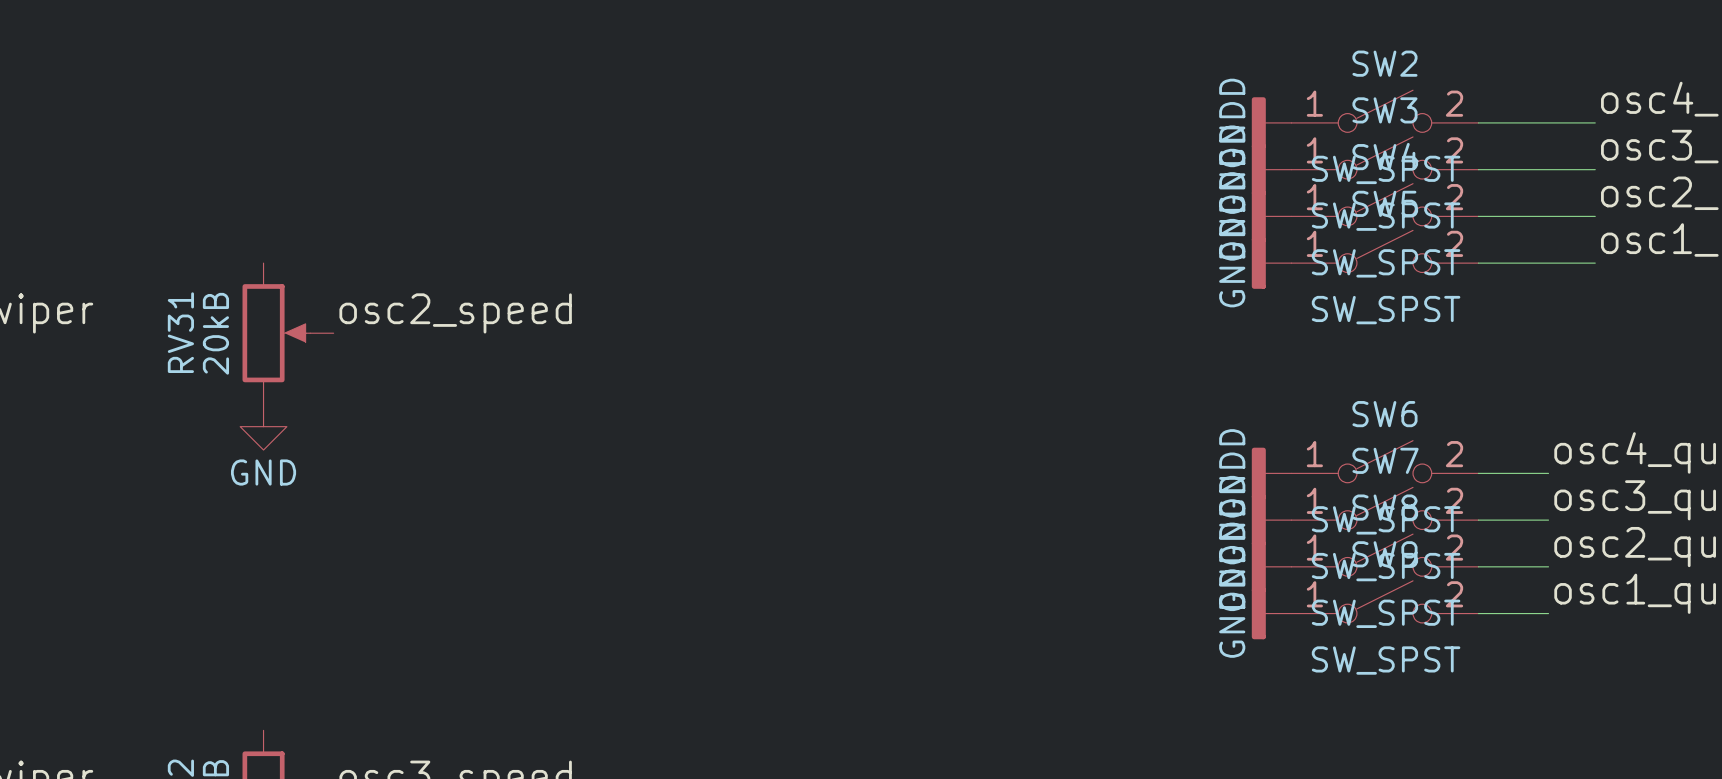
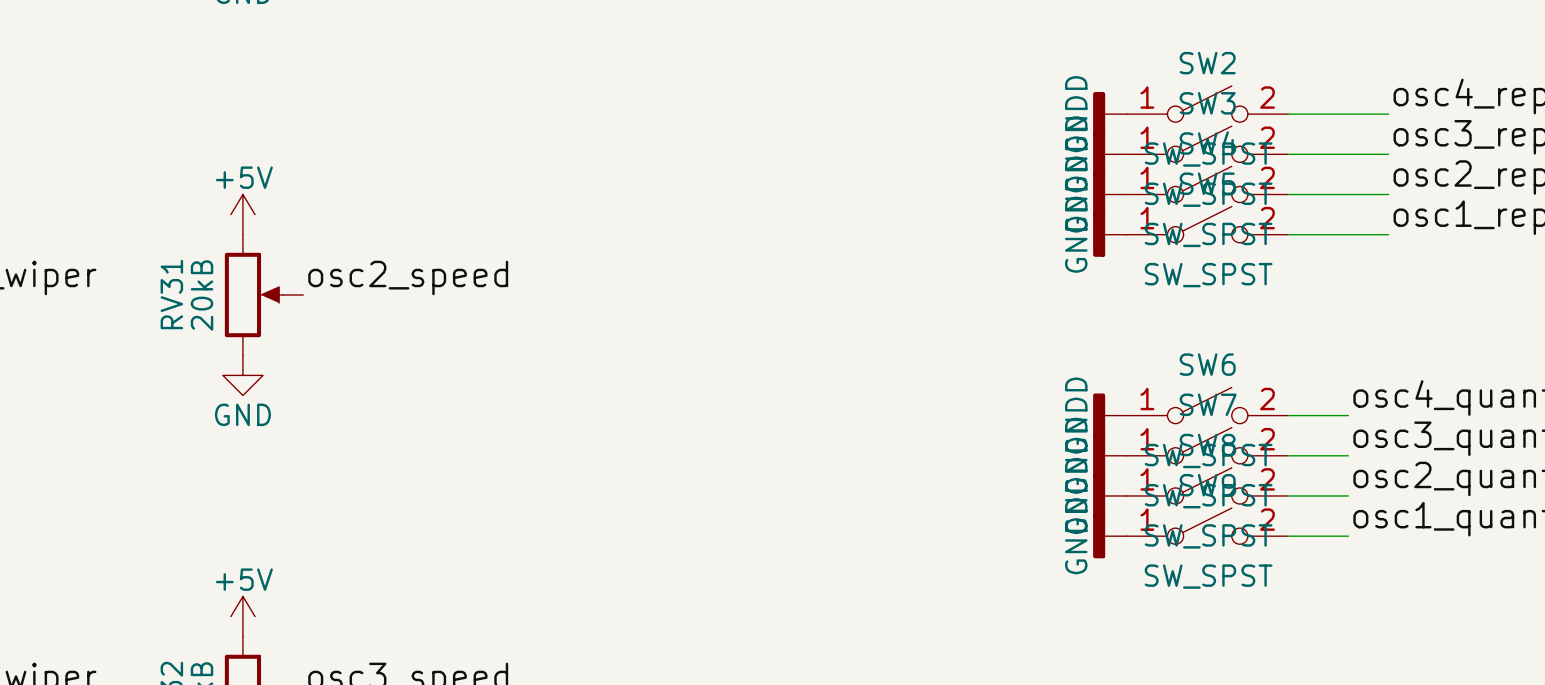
power symbol: none -> +5V (242, 214)
power symbol: none -> +5V (242, 616)

